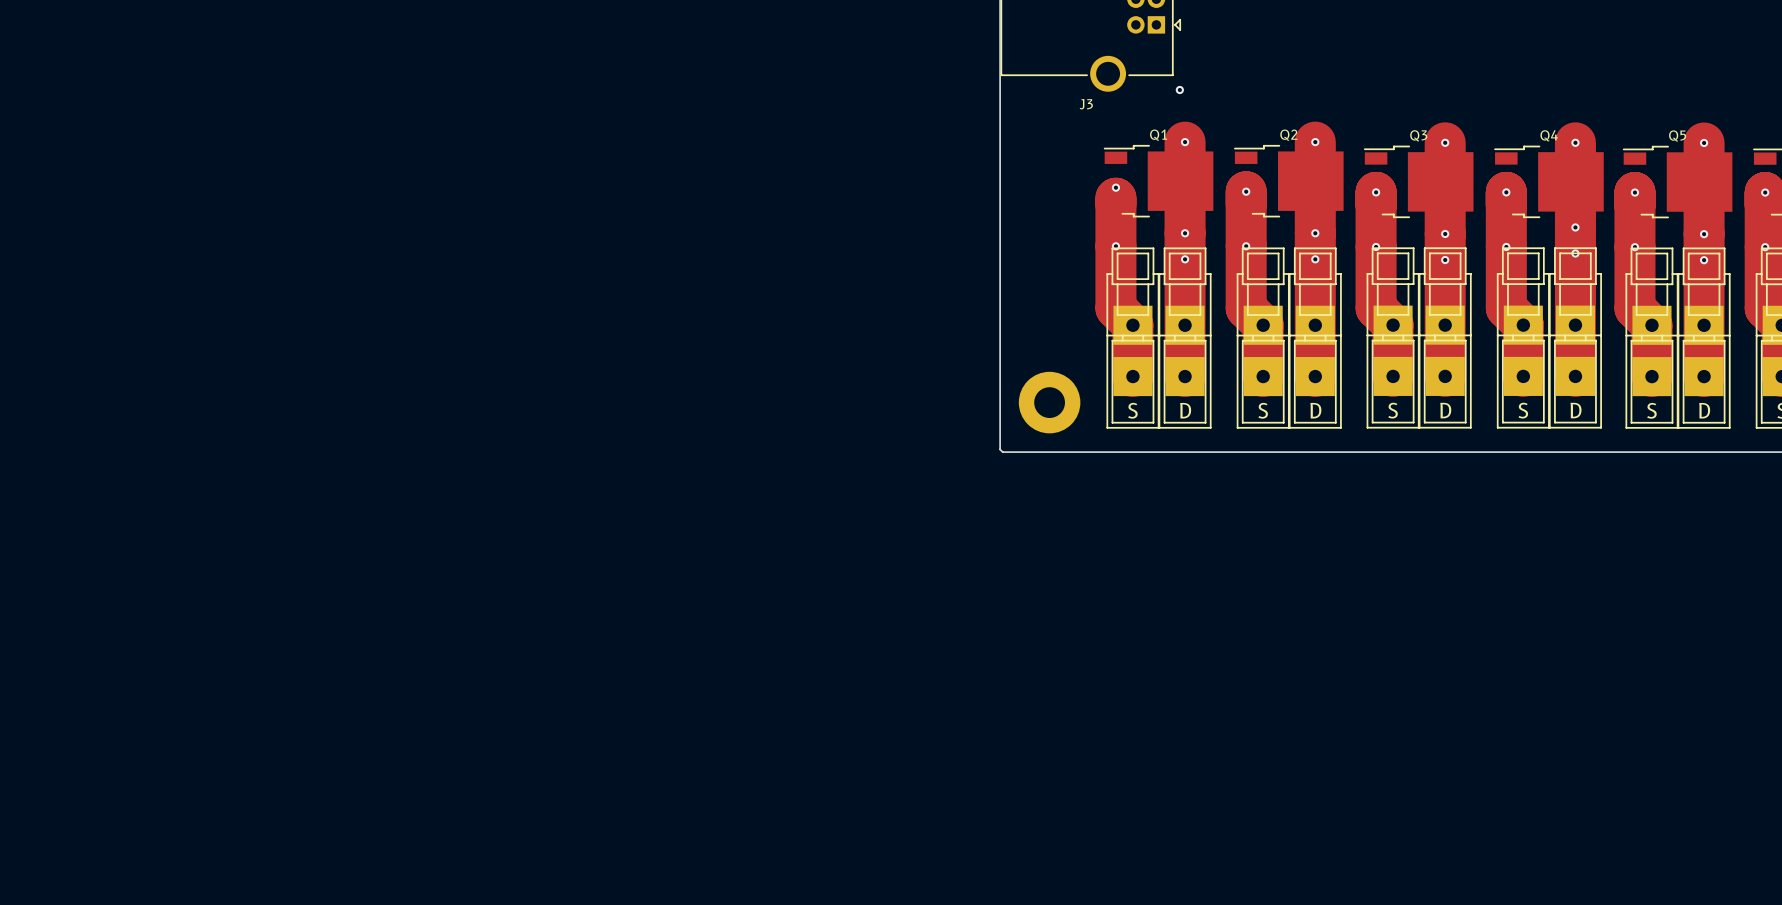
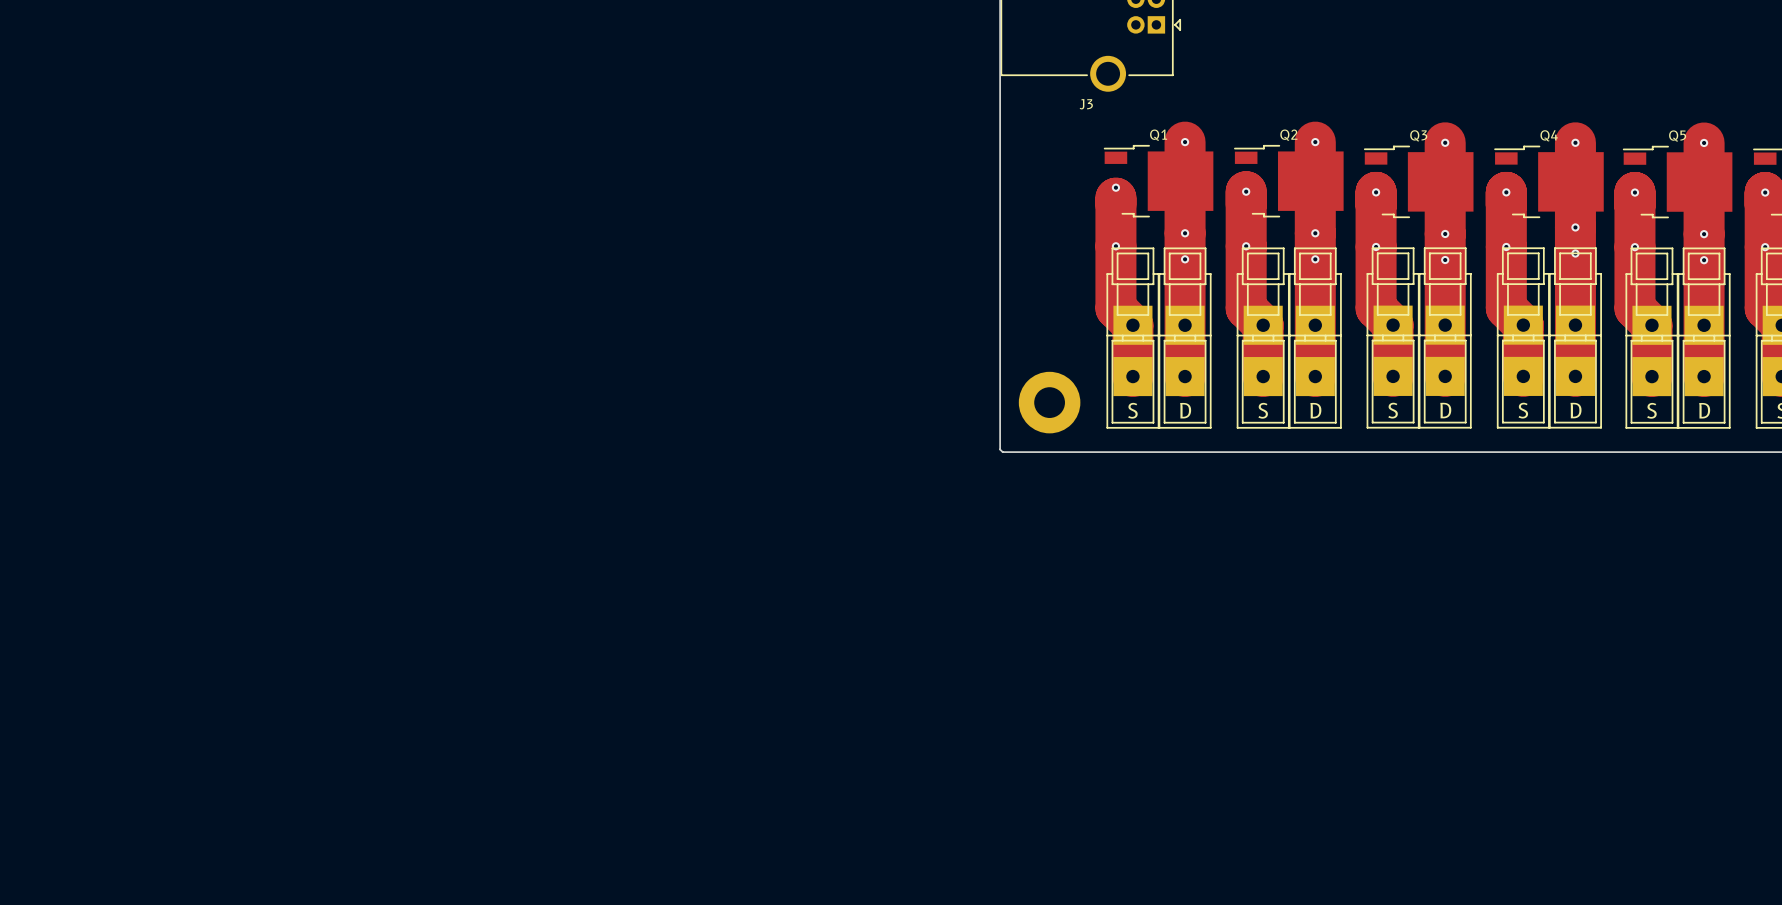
via: (1179, 90) -> none

